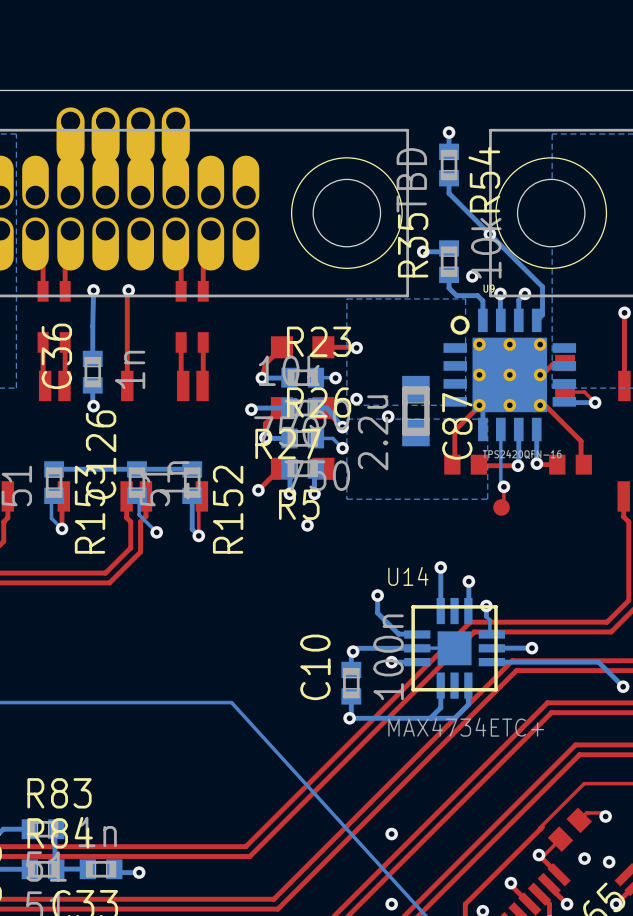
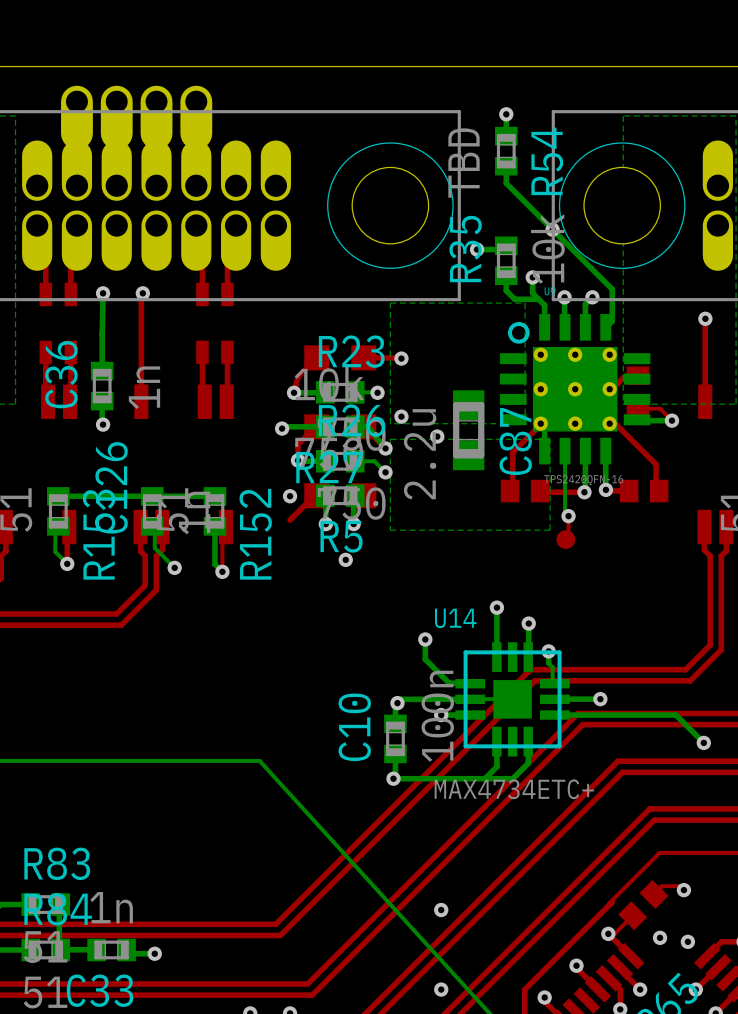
bottom track: none -> (532, 277) (532, 293) (538, 299)
via position: (258, 490) -> (290, 496)

